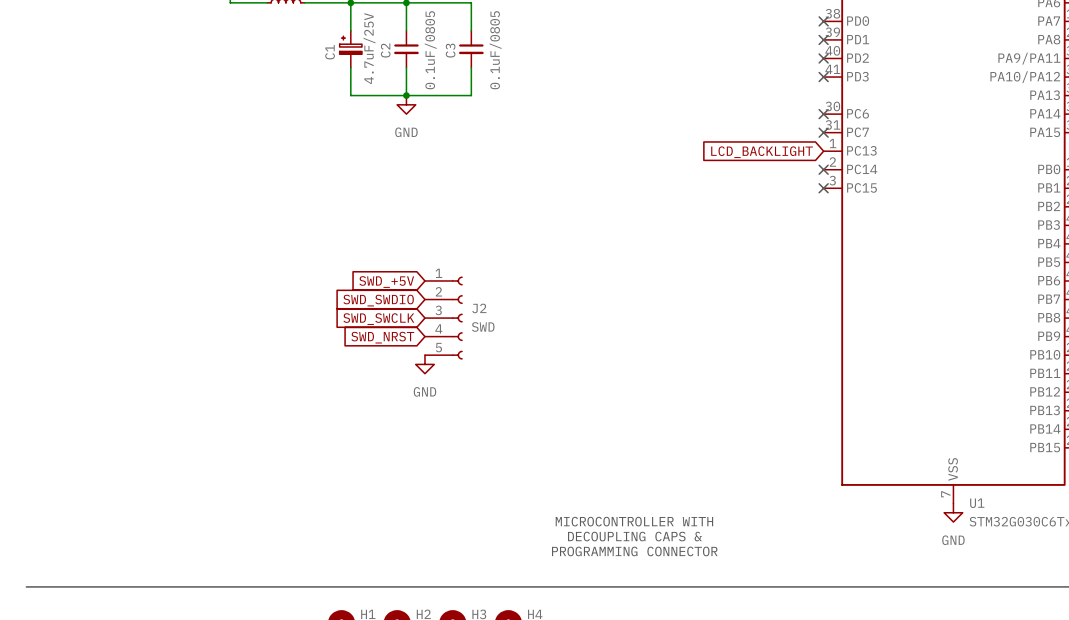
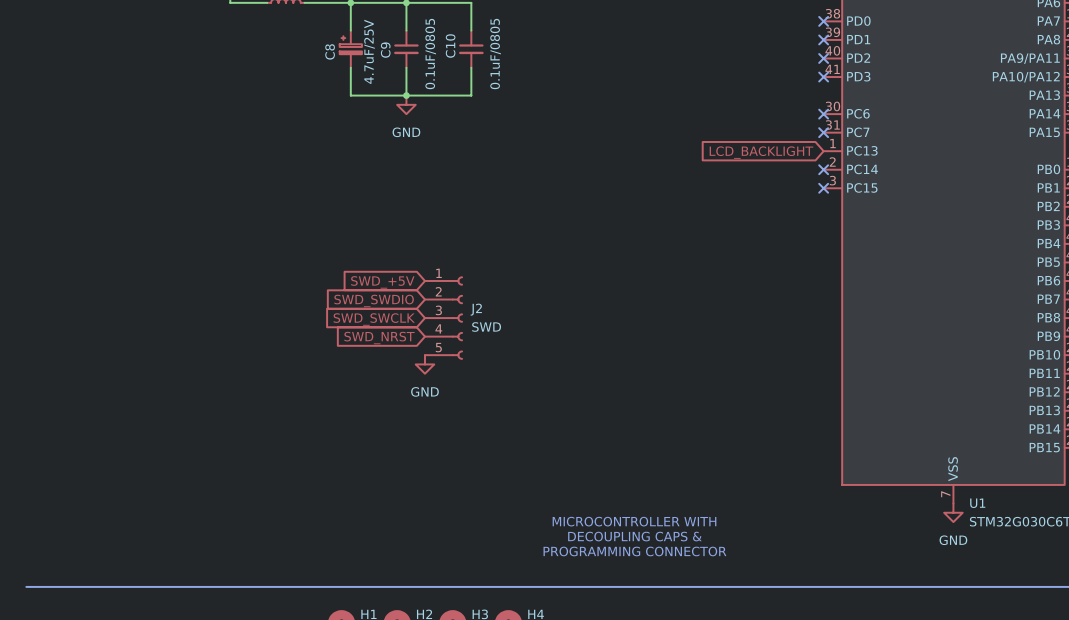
C2 name: C2 (385, 50) -> C9 (385, 50)
C3 name: C3 (450, 50) -> C10 (450, 46)
C1 name: C1 (330, 52) -> C8 (330, 51)

